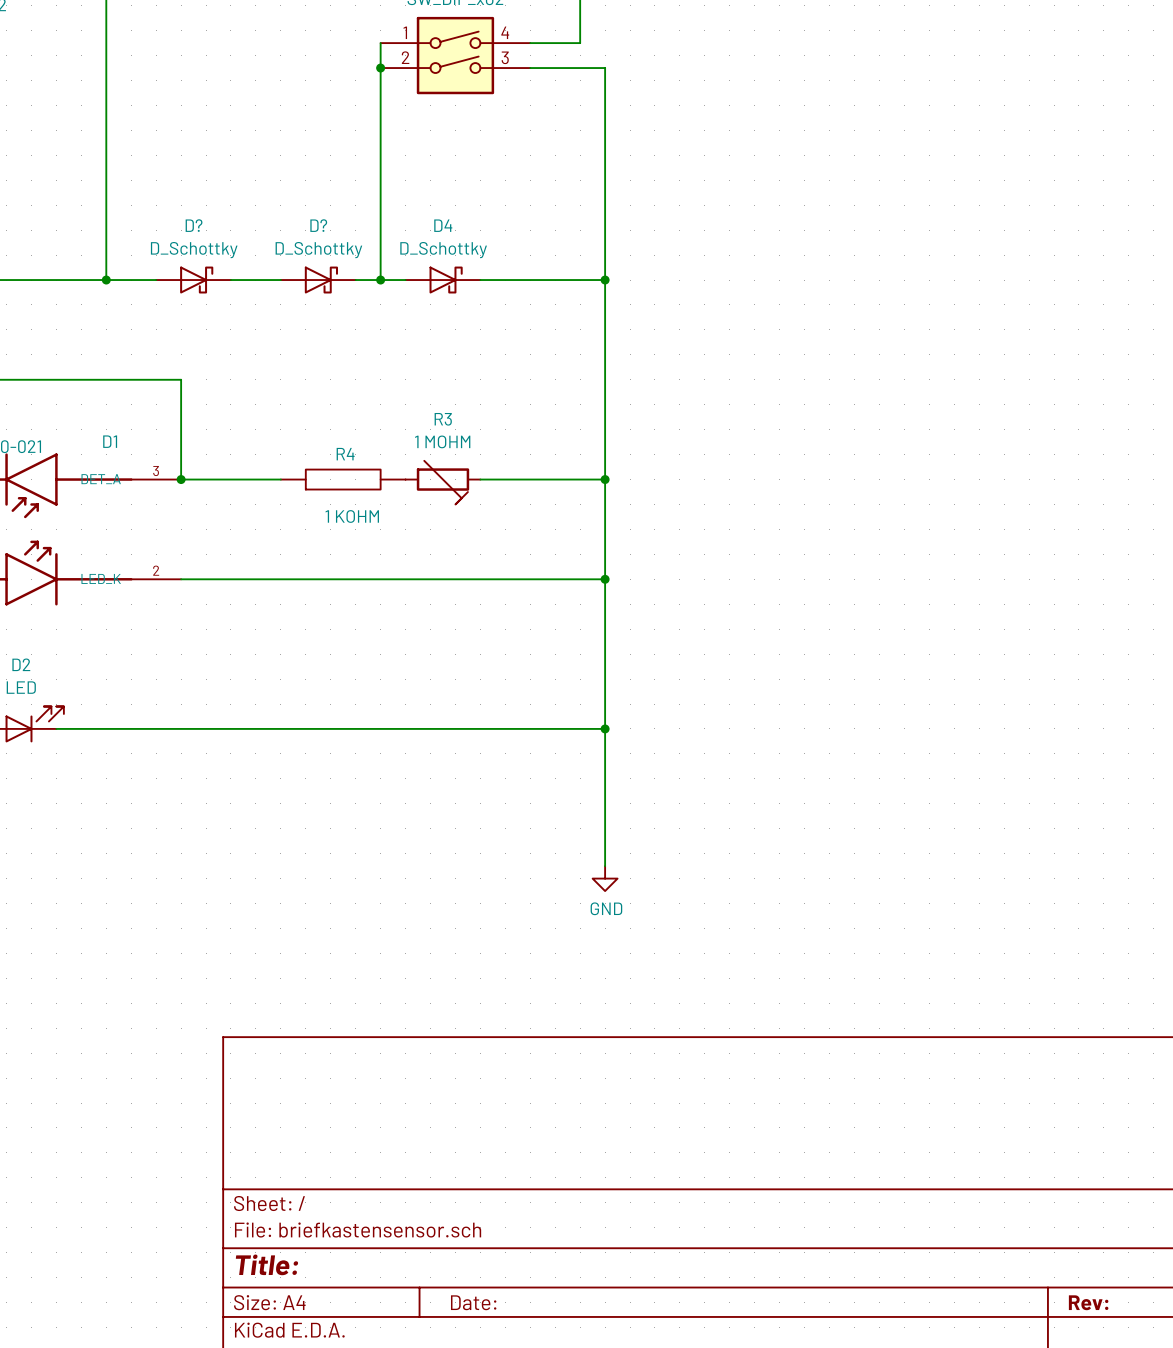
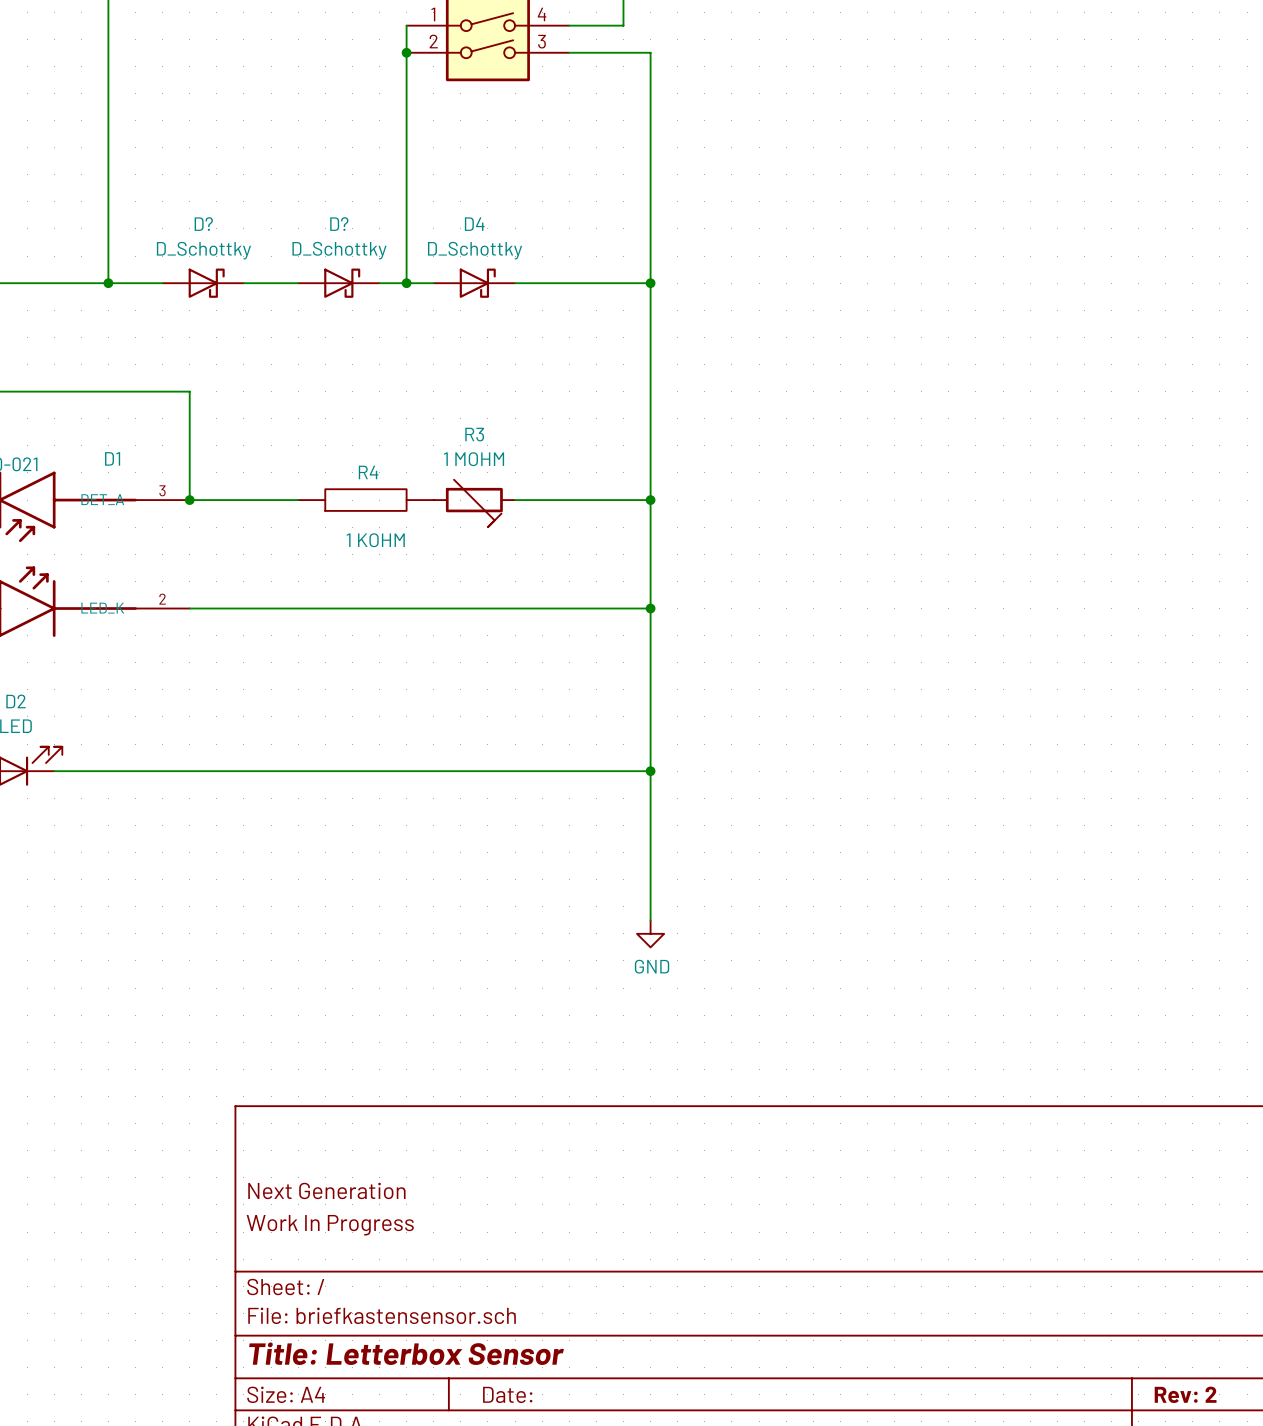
title block: none -> Next Generation (326, 1190)
title block: none -> Work In Progress (330, 1225)
title block: Title: (267, 1264) -> Title: Letterbox Sensor (406, 1353)
title block: Rev: (1088, 1302) -> Rev: 2 (1185, 1394)

